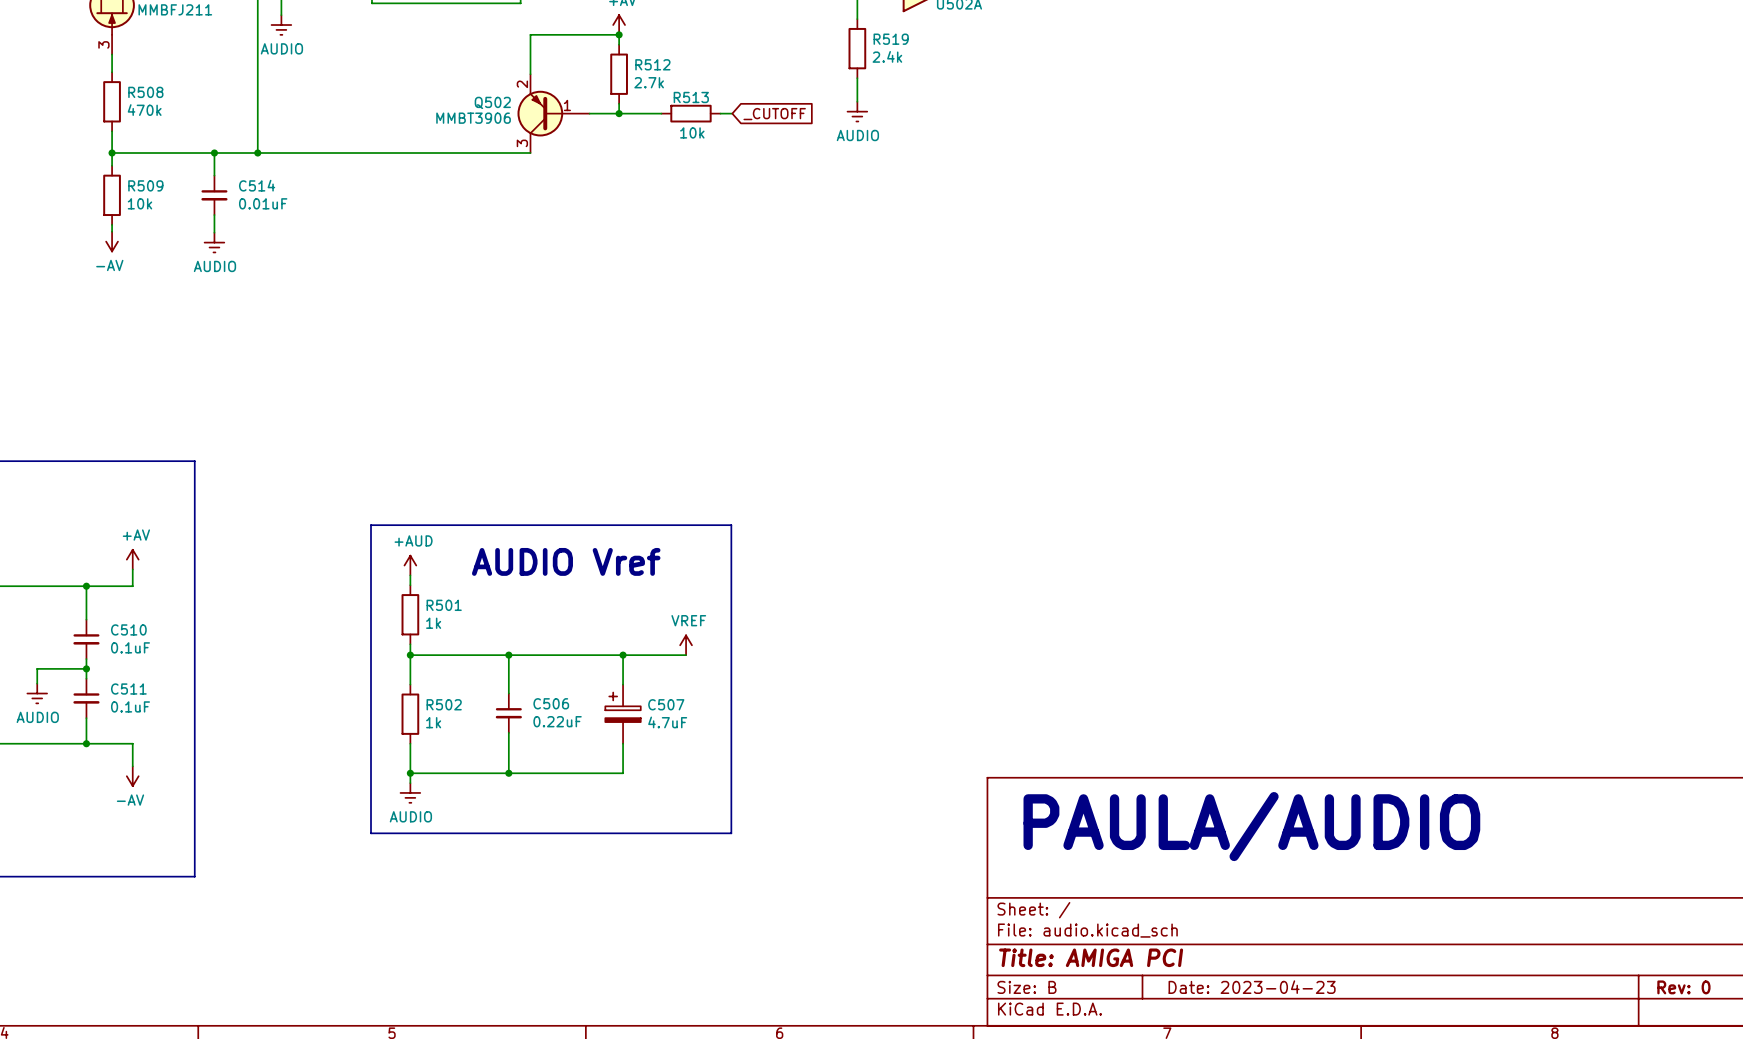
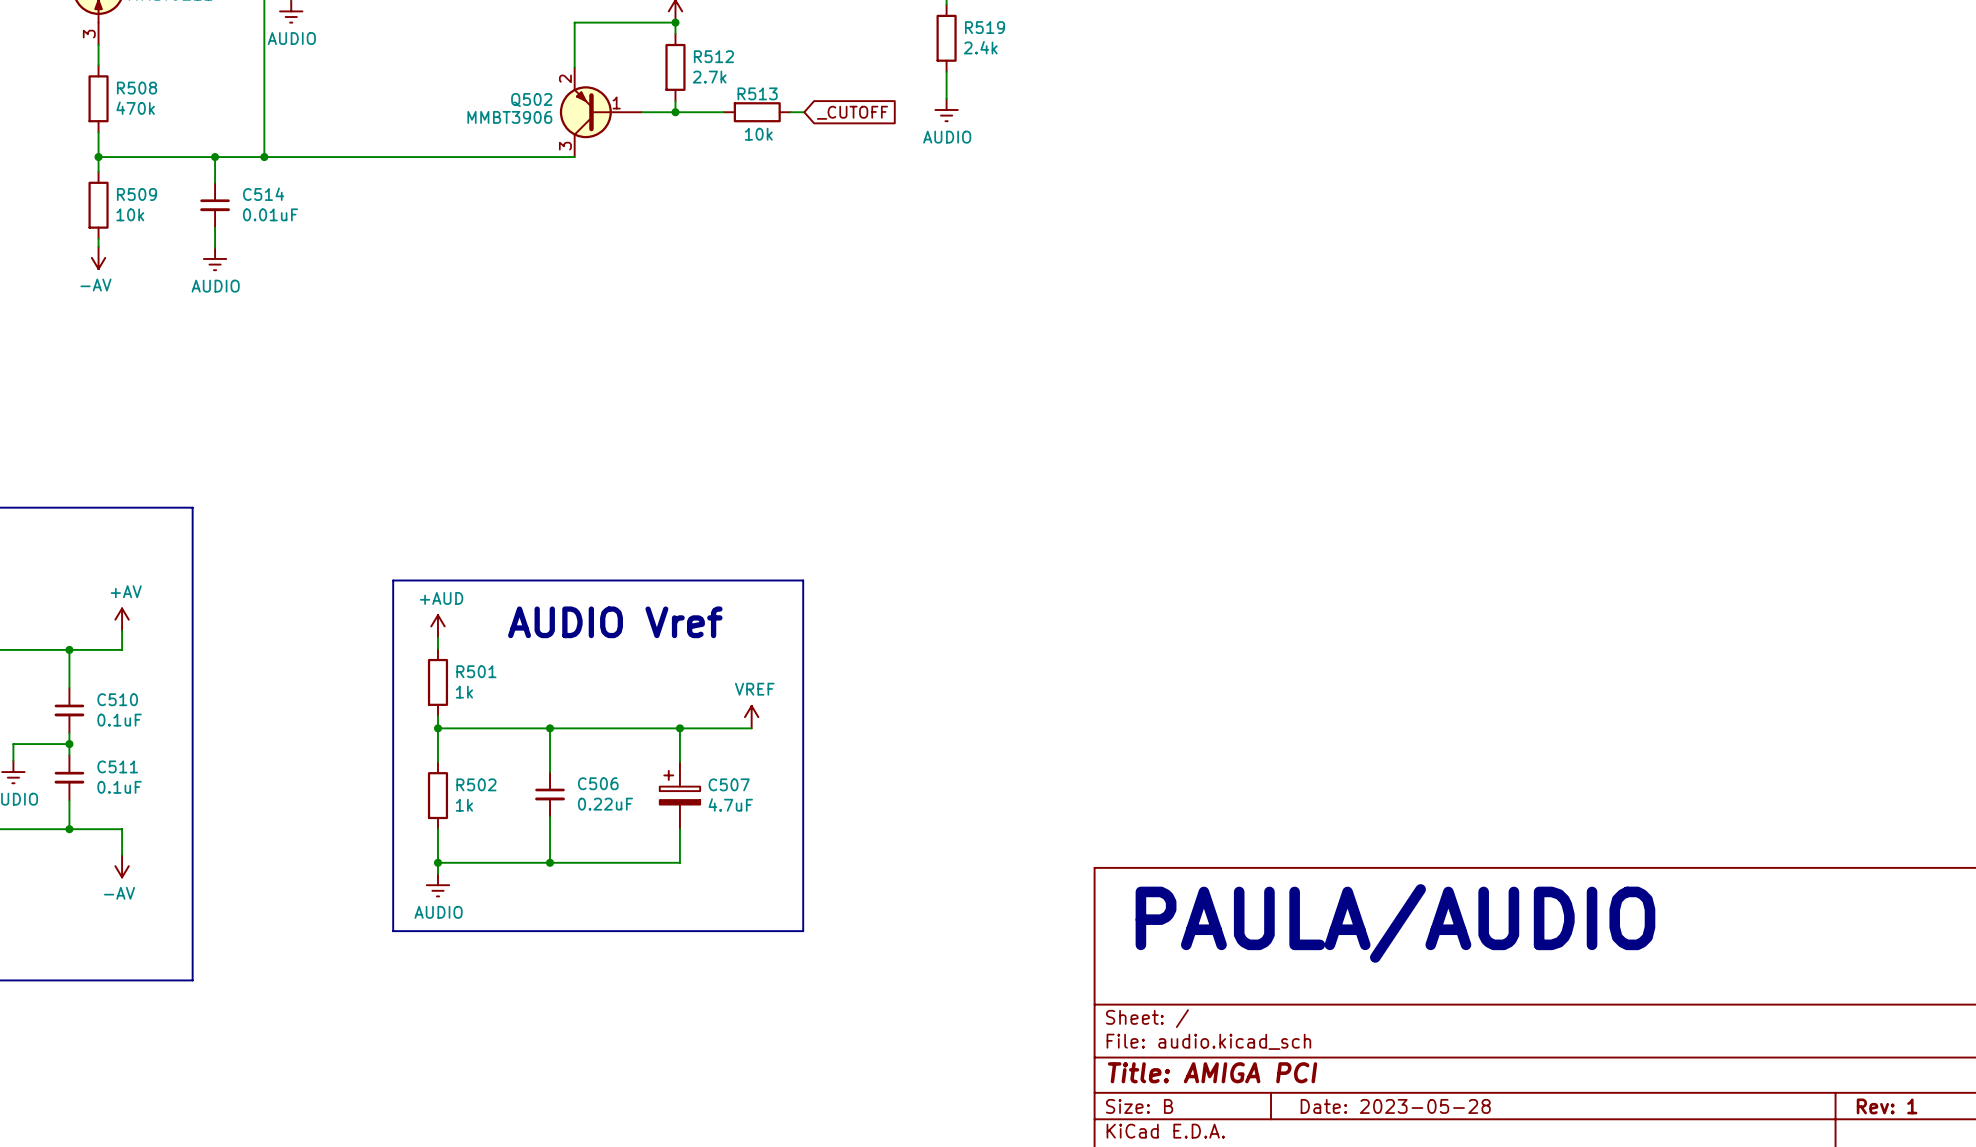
title block: Date: 2023-04-23 (1252, 987) -> Date: 2023-05-28 (1395, 1106)
title block: Rev: 0 (1683, 987) -> Rev: 1 (1887, 1106)

